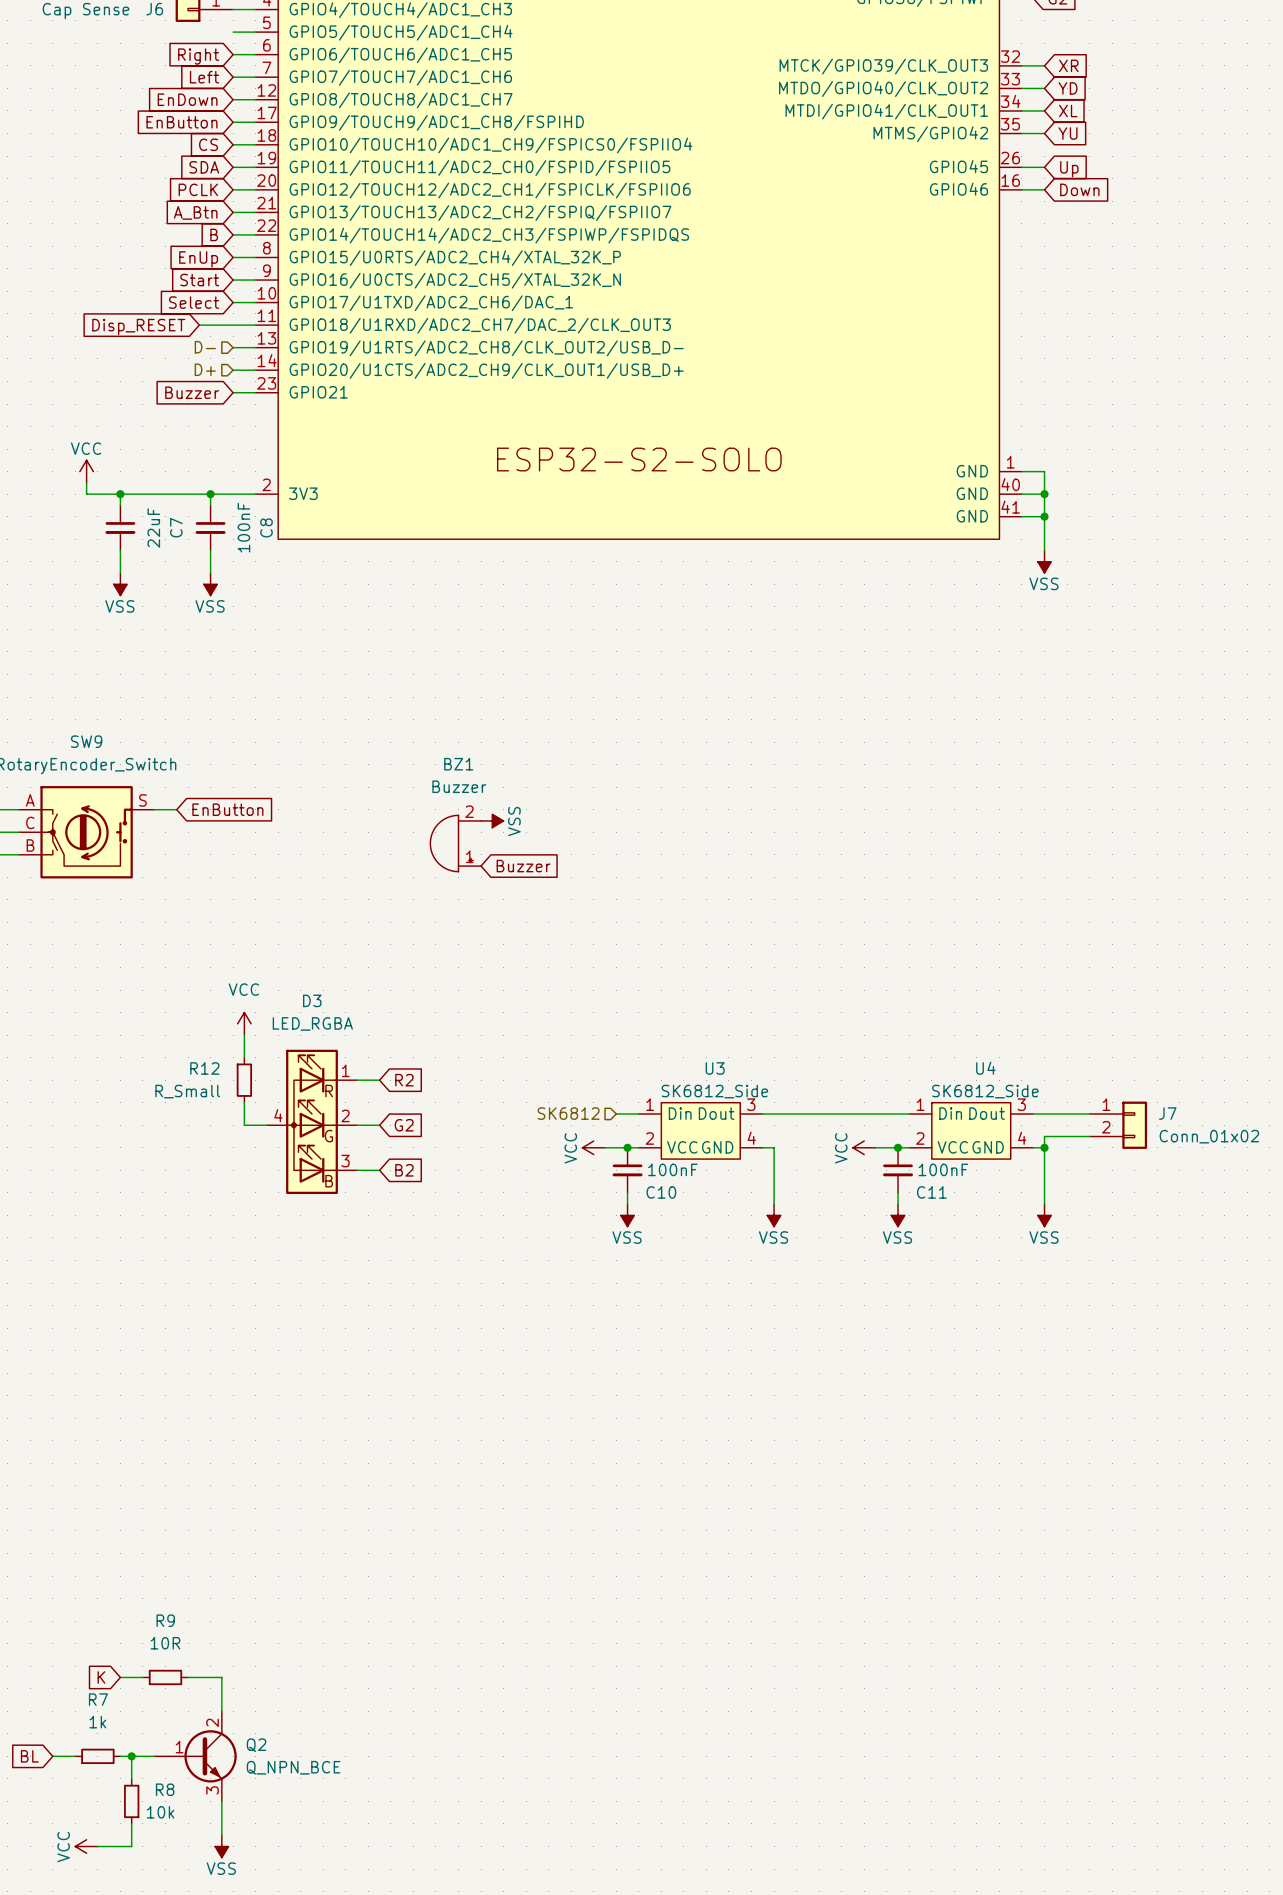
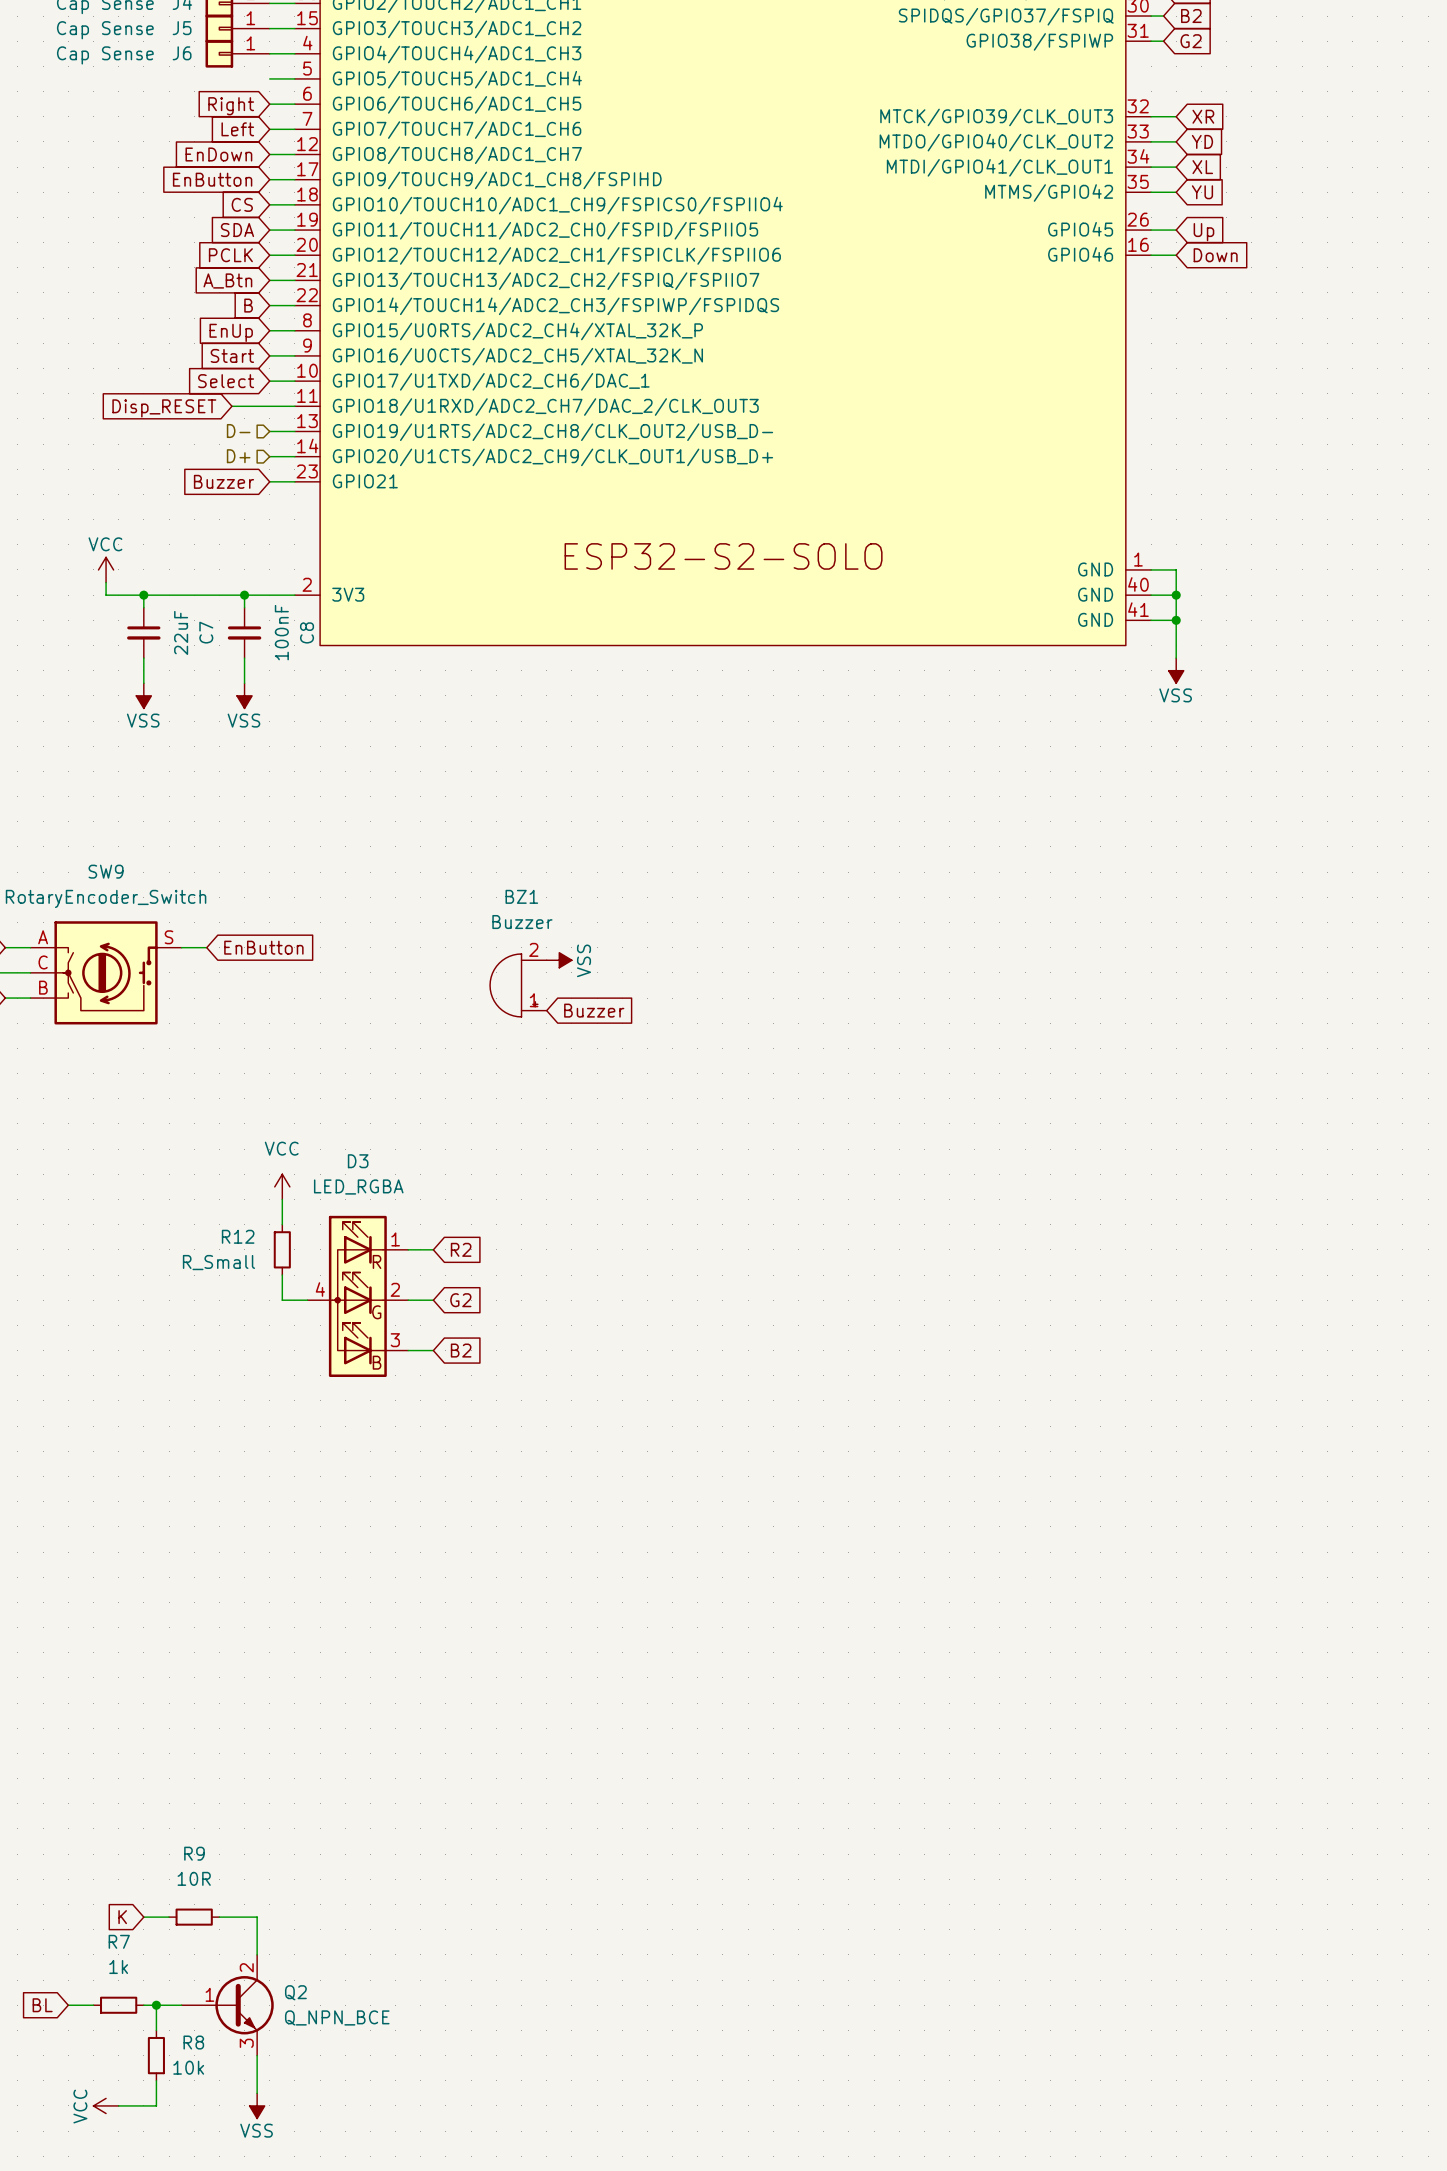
hierarchical label: SK6812 (568, 1113) -> none
wire: (616, 1113) (638, 1113) -> none
wire: (762, 1113) (909, 1113) -> none
wire: (1033, 1113) (1089, 1113) -> none
J7: Conn_01x02 (1118, 1125) -> none
U3: SK6812_Side (703, 1130) -> none
U4: SK6812_Side (974, 1130) -> none
wire: (1089, 1136) (1044, 1136) (1044, 1204) -> none
power symbol: VCC (593, 1147) -> none
wire: (605, 1147) (638, 1147) -> none
junction: (627, 1147) -> none
wire: (762, 1147) (774, 1147) (774, 1204) -> none
power symbol: VCC (864, 1147) -> none
wire: (875, 1147) (909, 1147) -> none
junction: (898, 1147) -> none
wire: (1033, 1147) (1044, 1147) -> none
junction: (1044, 1147) -> none
C10: 100nF (627, 1170) -> none
C11: 100nF (898, 1170) -> none
wire: (627, 1192) (627, 1204) -> none
wire: (898, 1192) (898, 1204) -> none
power symbol: VSS (627, 1215) -> none
power symbol: VSS (774, 1215) -> none
power symbol: VSS (898, 1215) -> none
power symbol: VSS (1044, 1215) -> none

